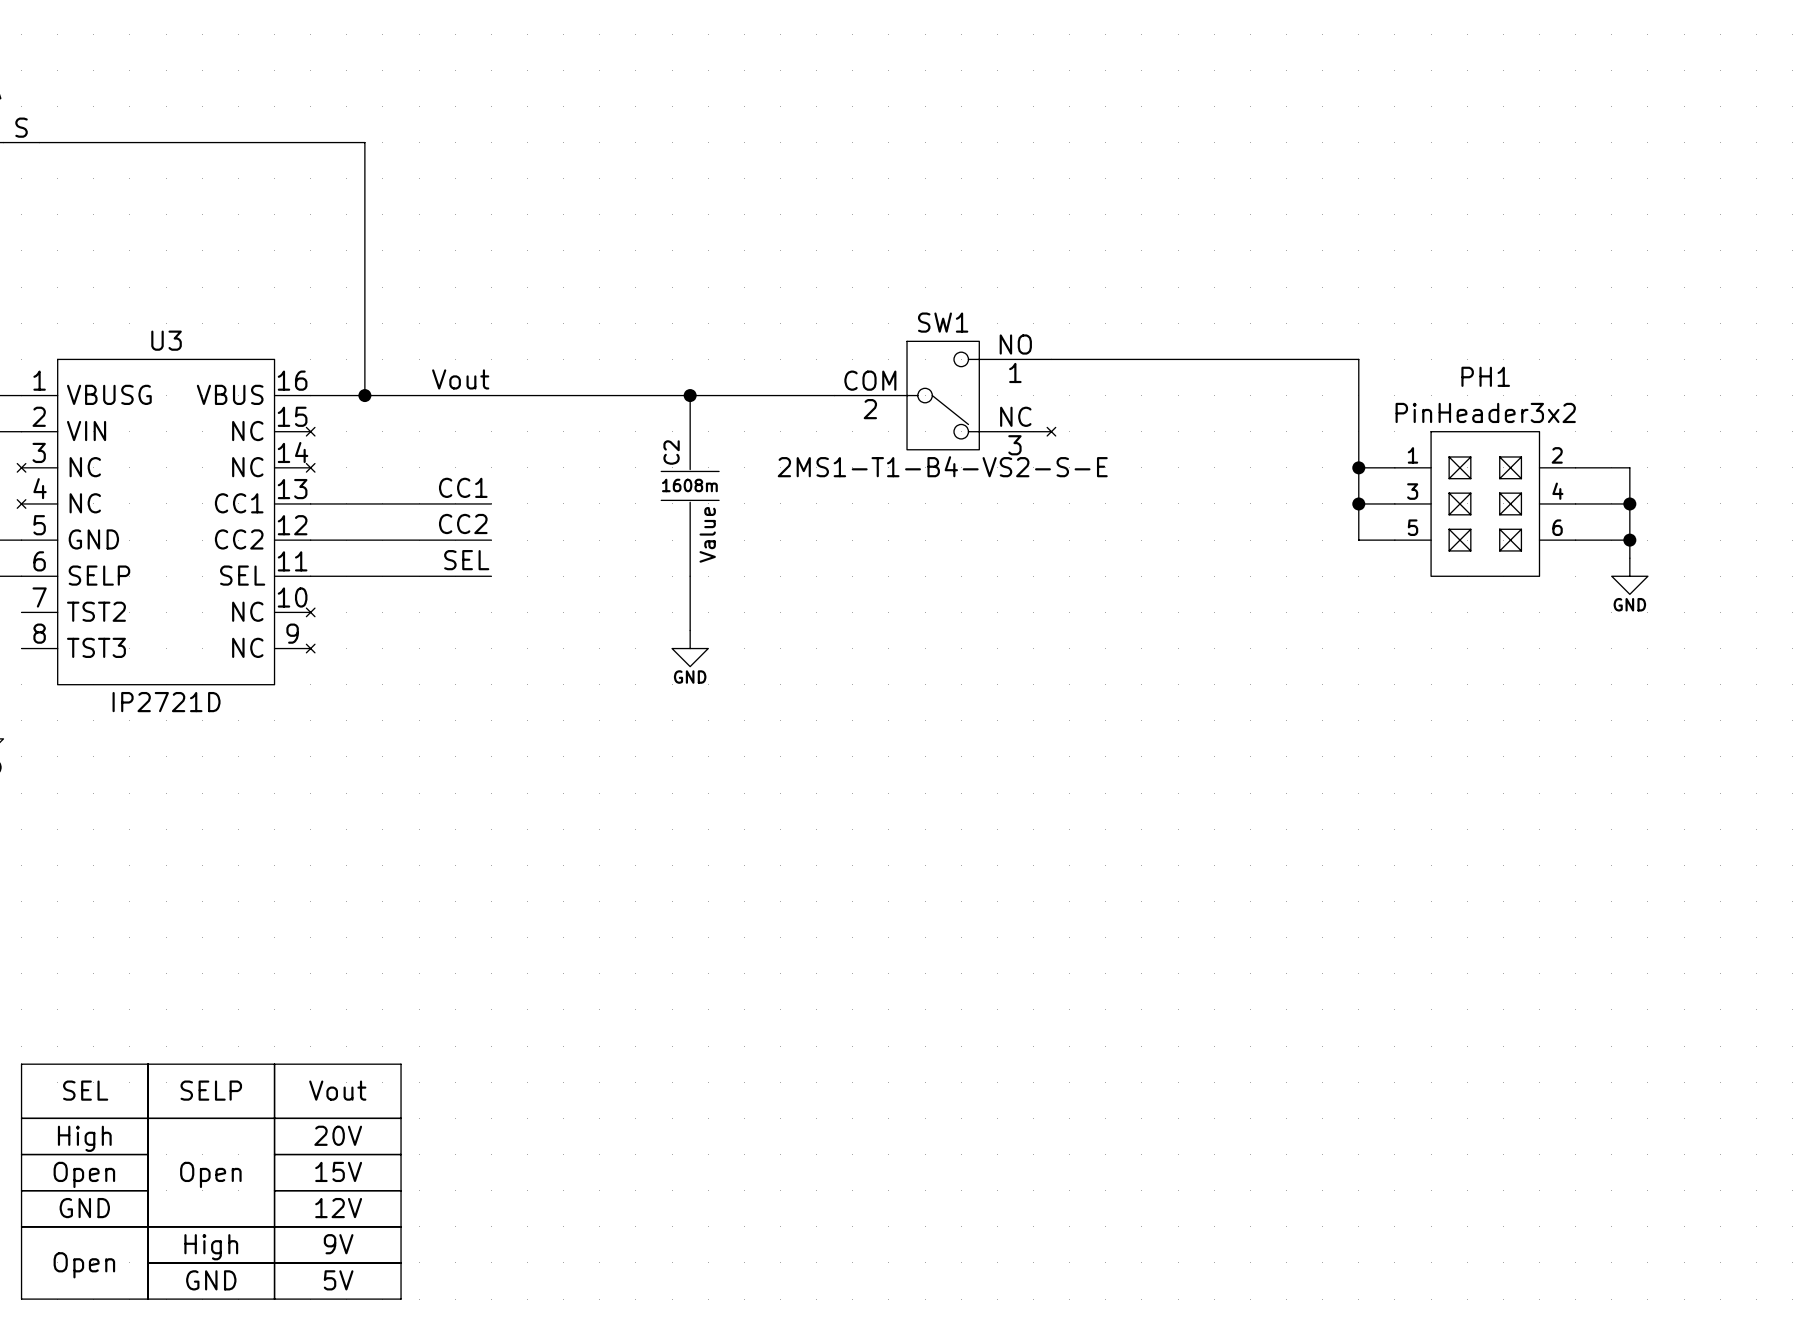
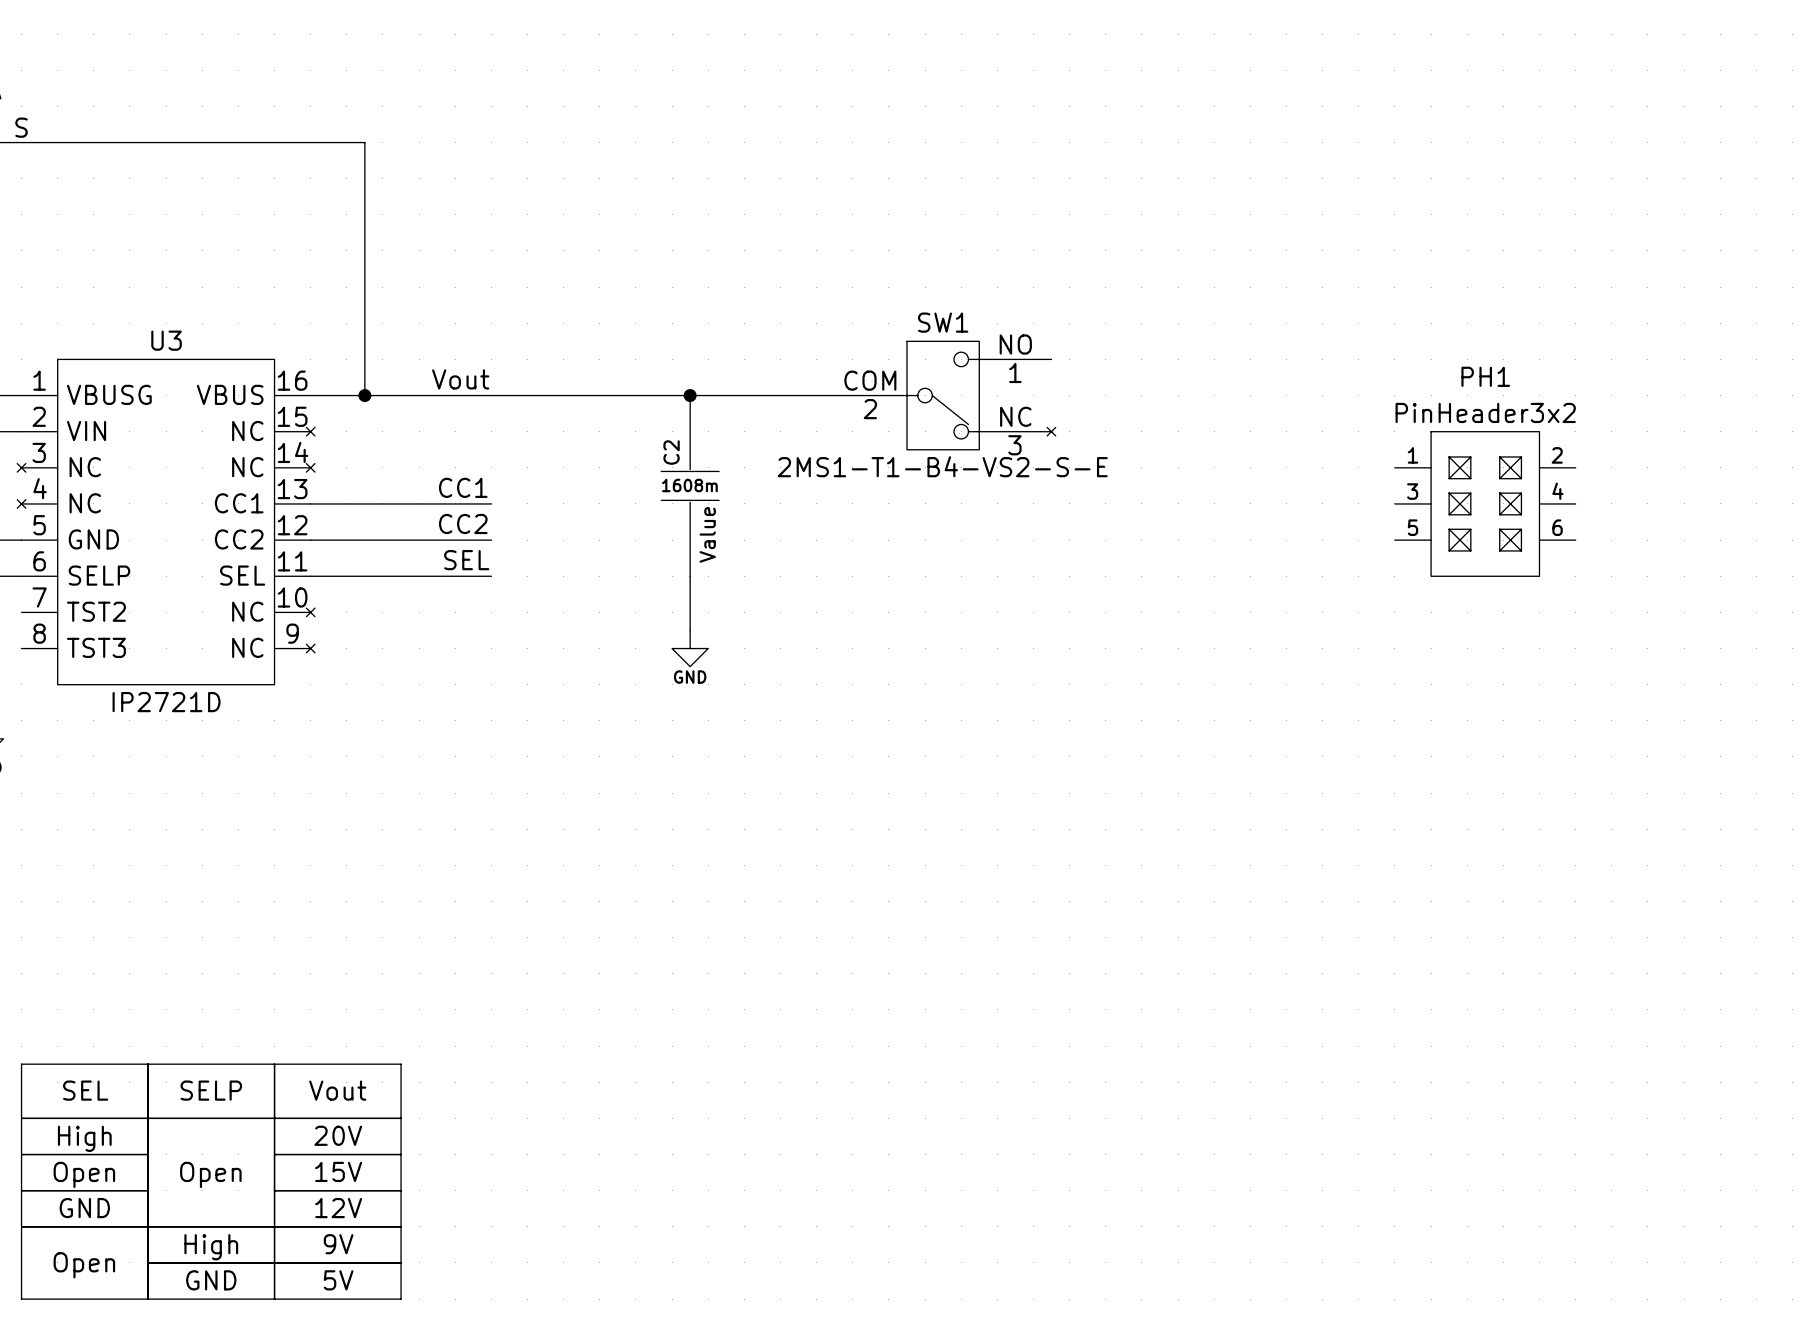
wire: (1051, 359) (1358, 359) (1358, 540) (1394, 540) -> none
wire: (1358, 467) (1394, 467) -> none
junction: (1358, 467) -> none
wire: (1575, 467) (1629, 467) (1629, 558) -> none
wire: (1358, 503) (1394, 503) -> none
junction: (1358, 503) -> none
wire: (1575, 503) (1629, 503) -> none
junction: (1629, 503) -> none
wire: (1575, 540) (1629, 540) -> none
junction: (1629, 540) -> none
power symbol: GND (1629, 576) -> none

